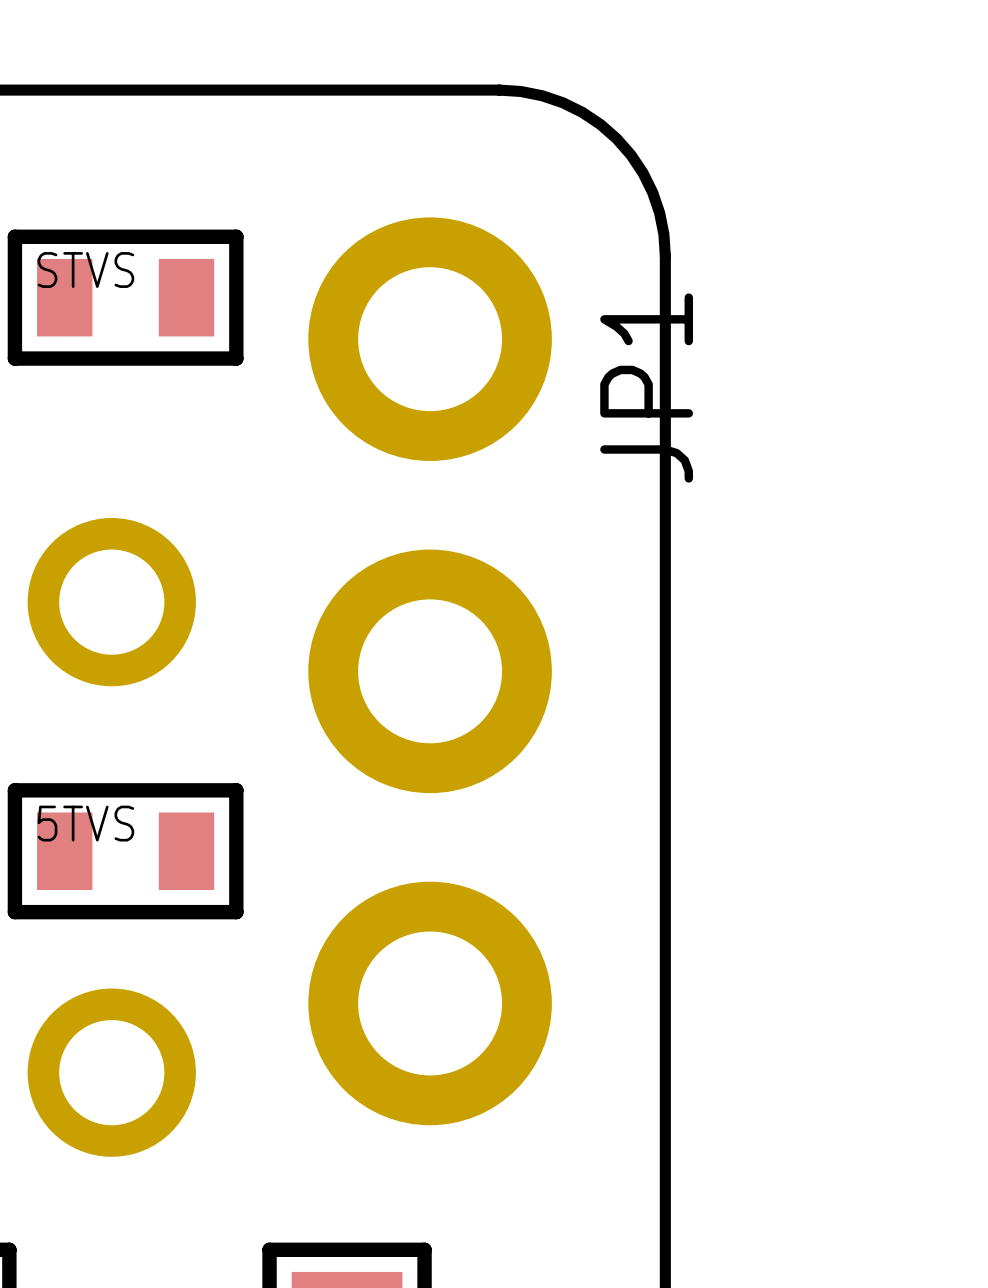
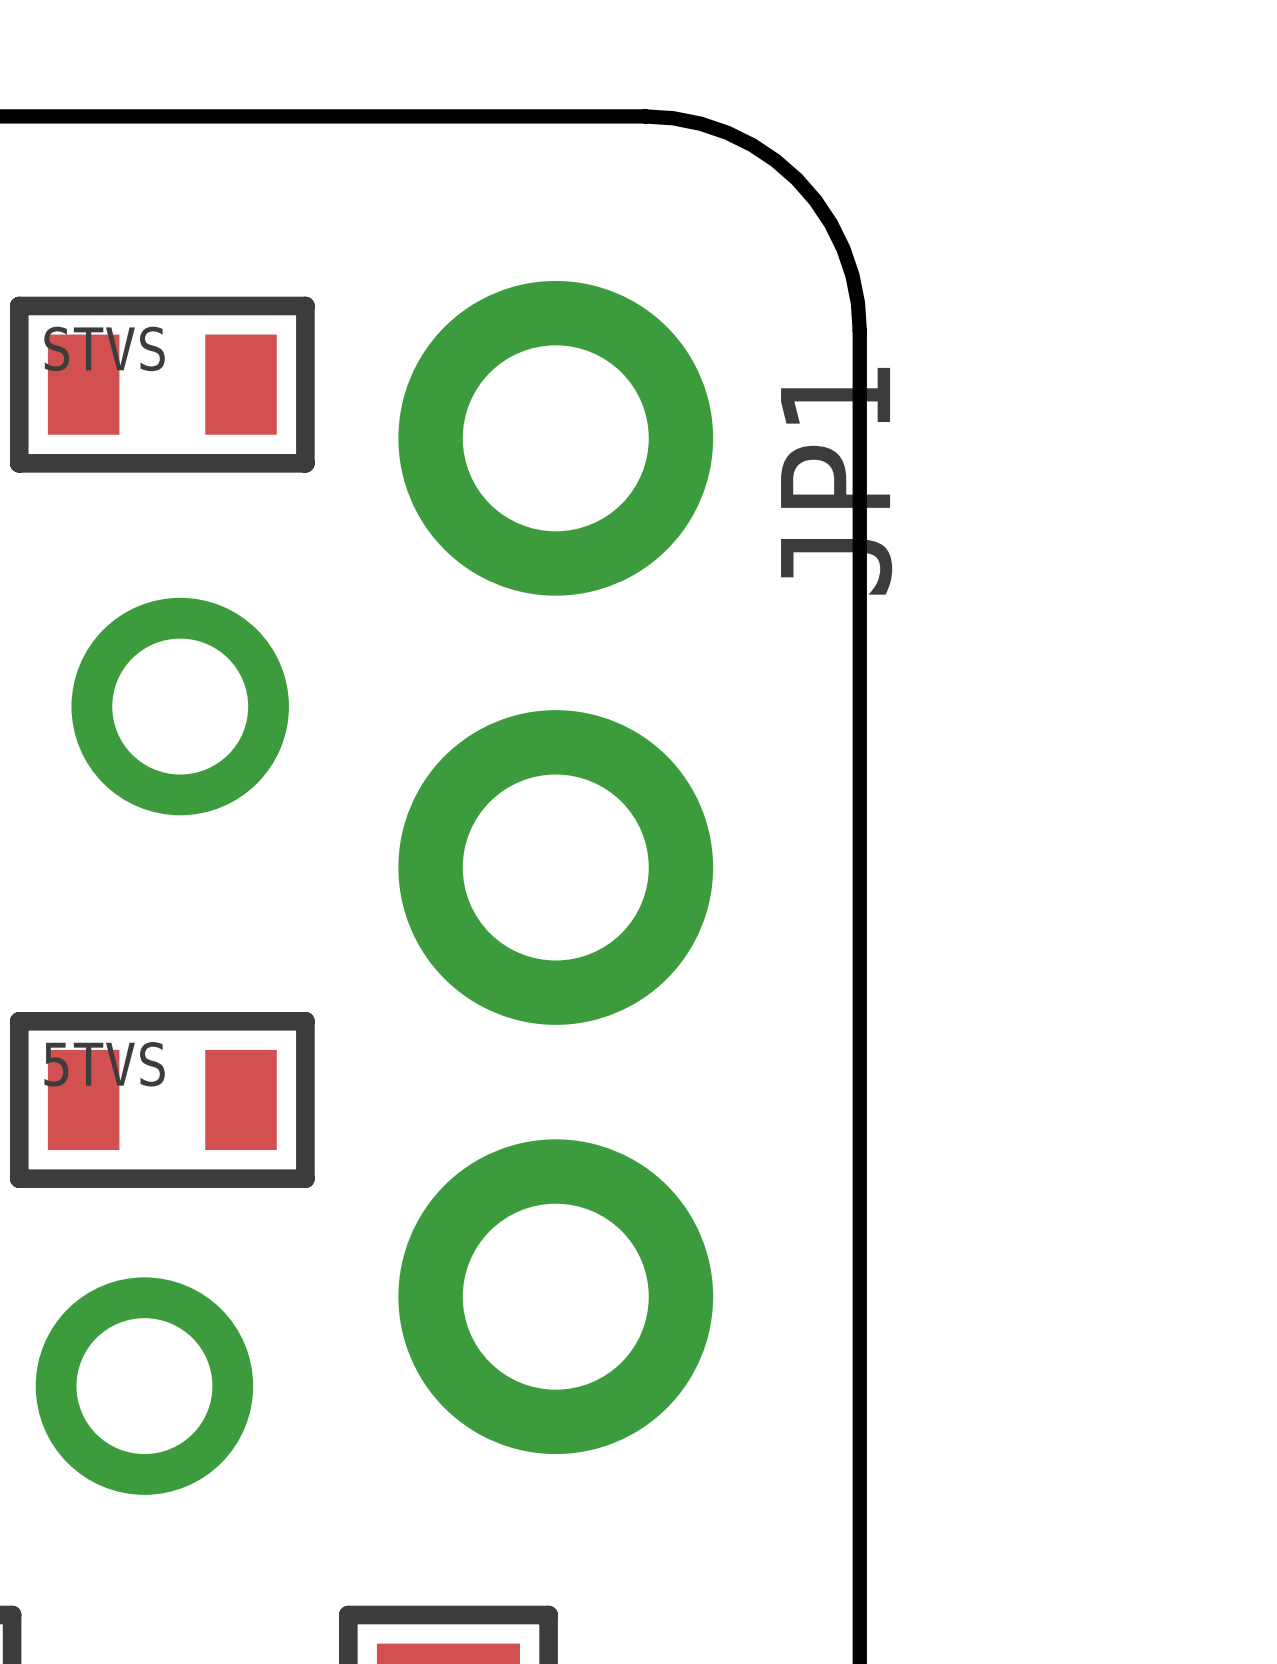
part position: (111, 602) -> (180, 706)

